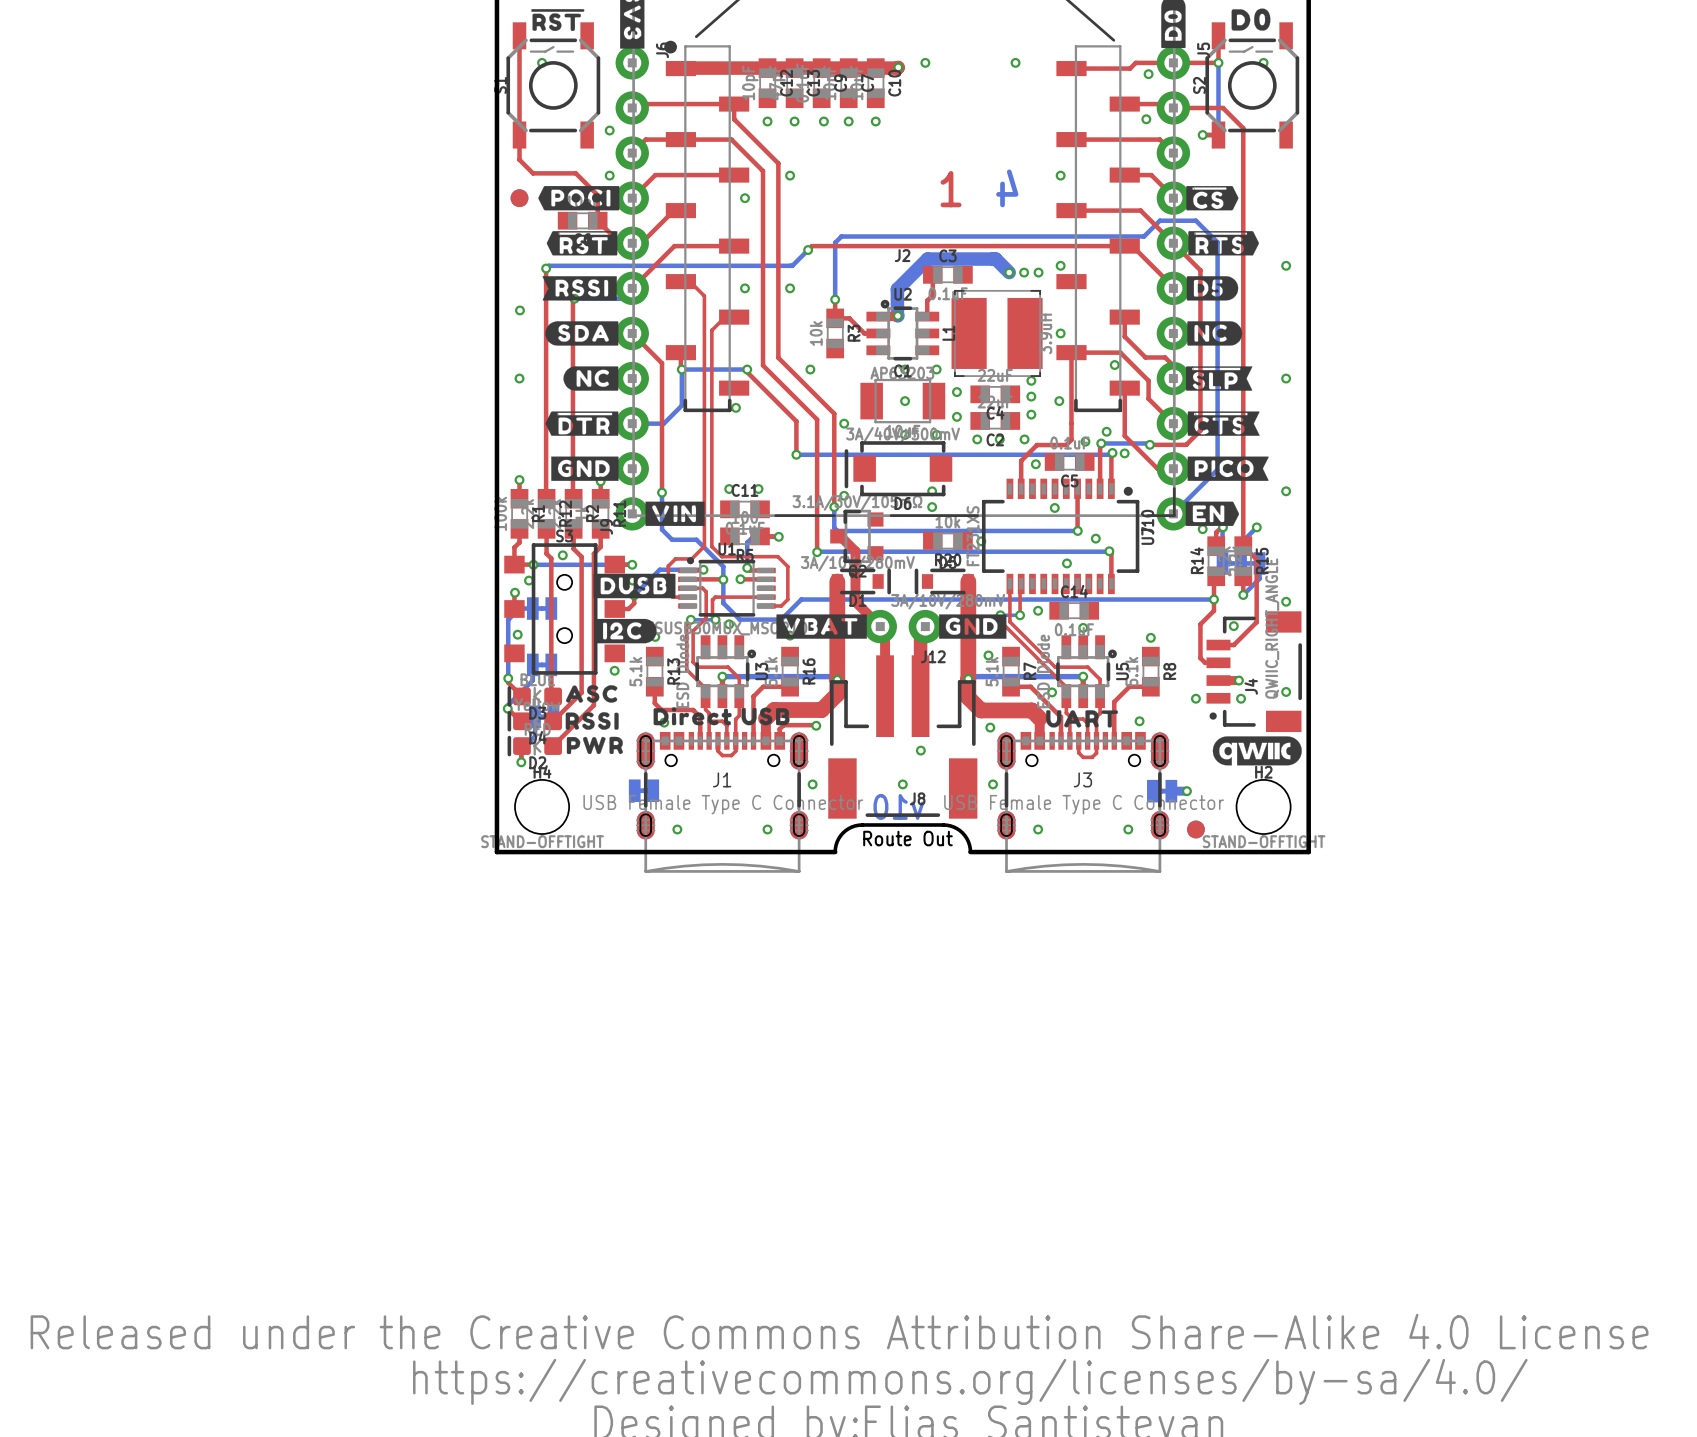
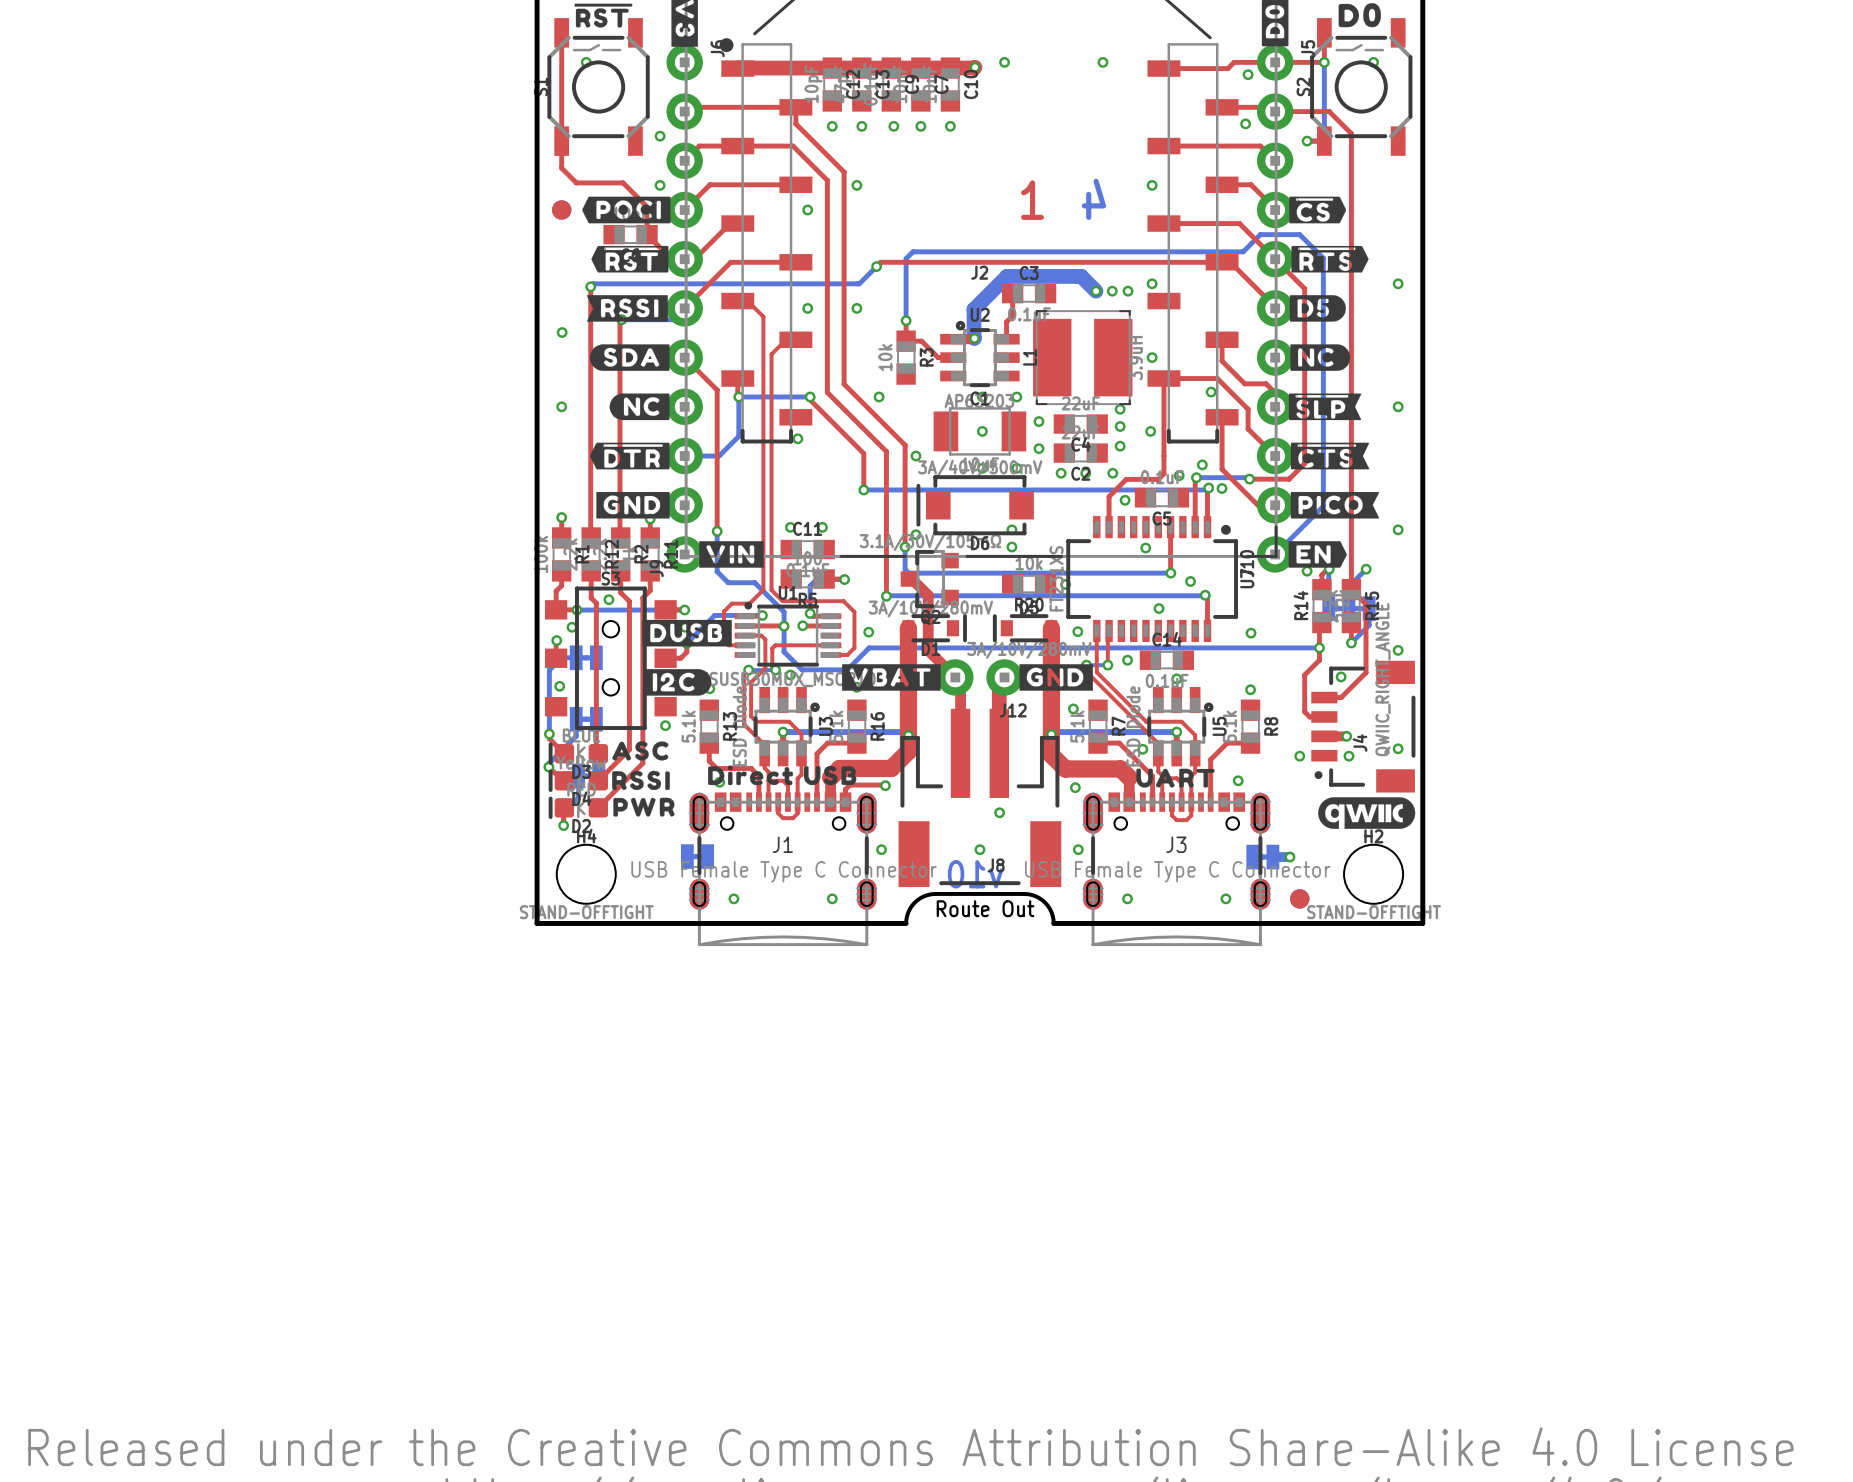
via: none -> (1077, 631)
via: none -> (868, 632)
via: none -> (1251, 633)

